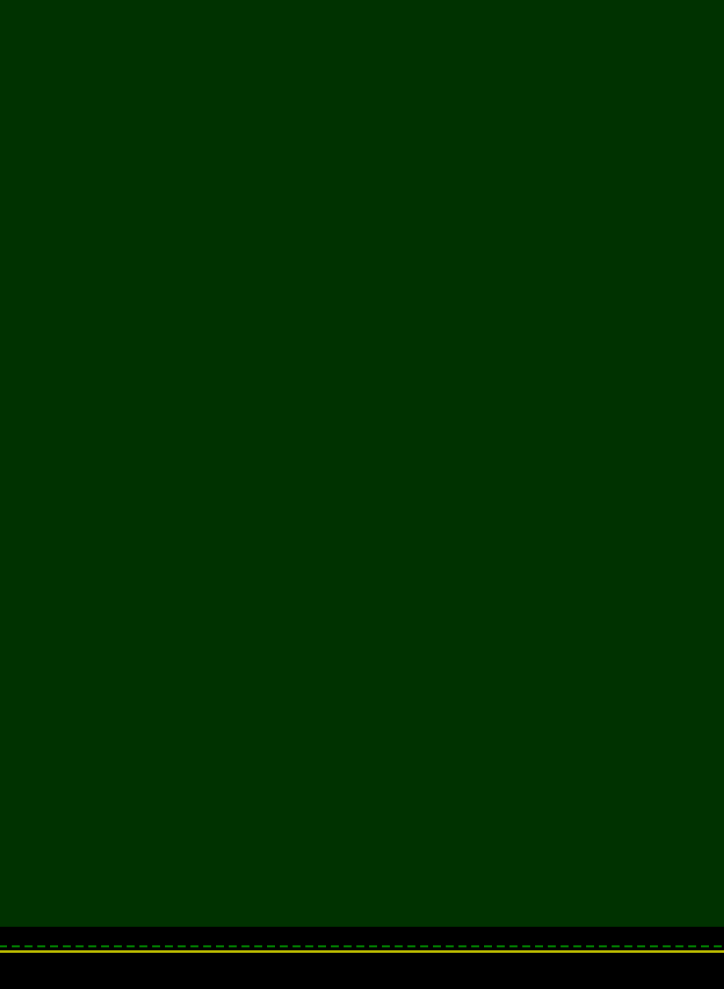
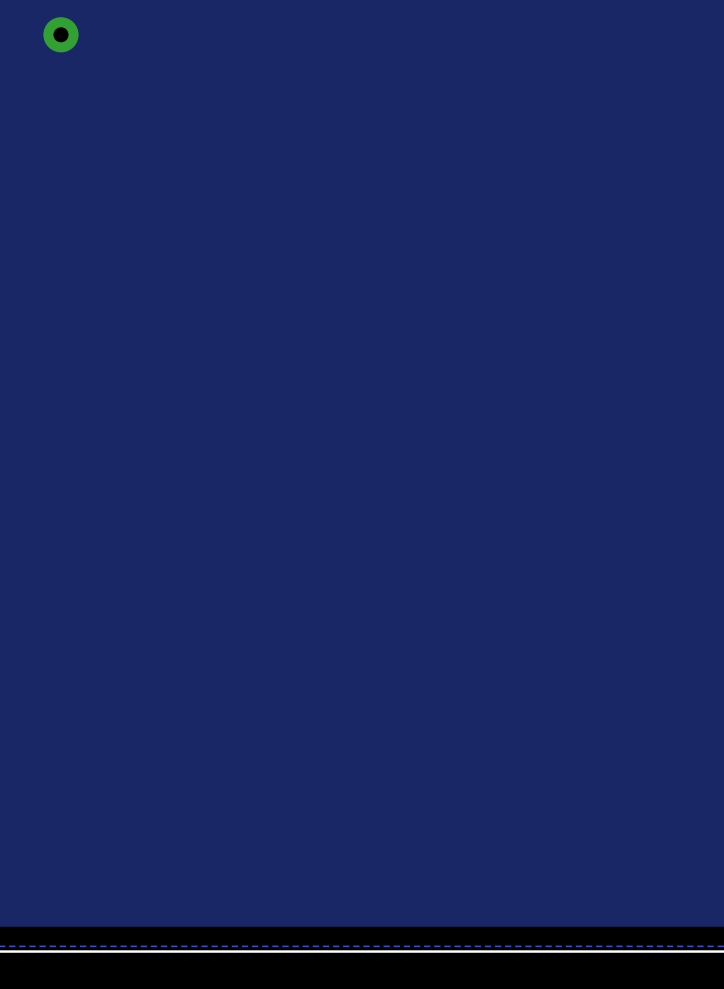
via: none -> (60, 34)

